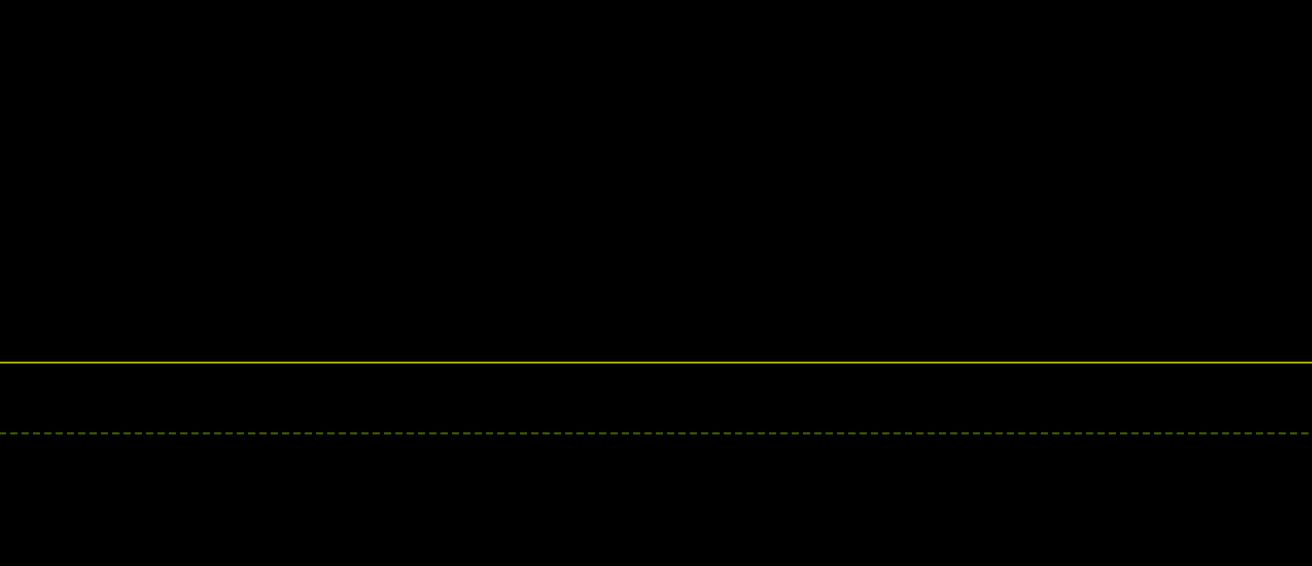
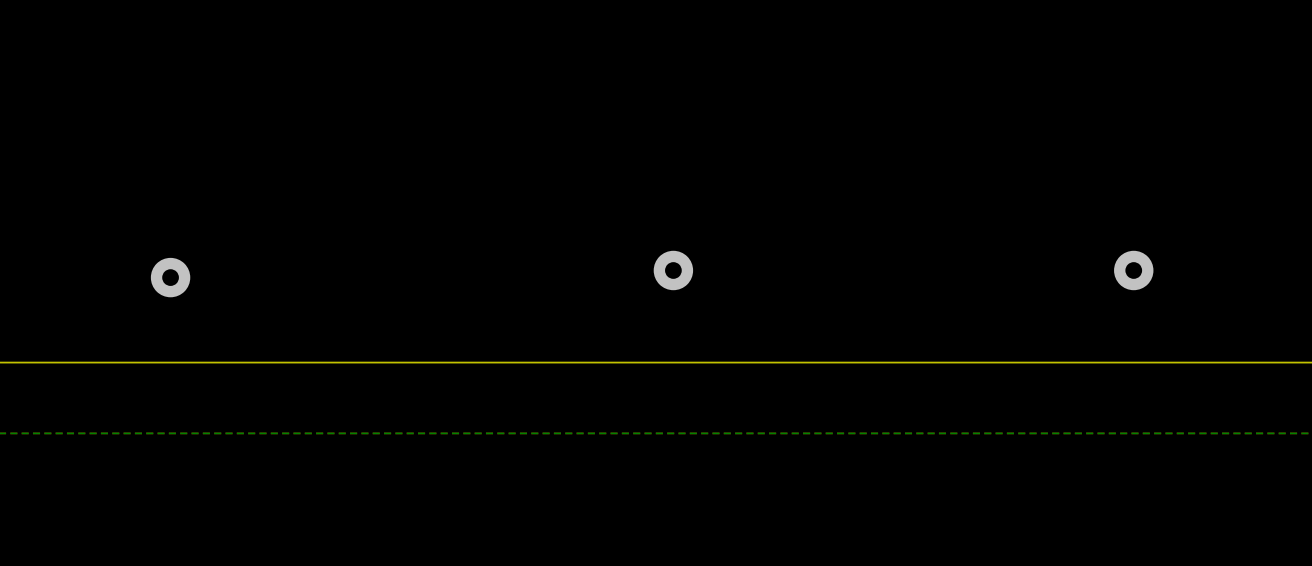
via: none -> (673, 270)
via: none -> (1133, 270)
via: none -> (170, 277)

